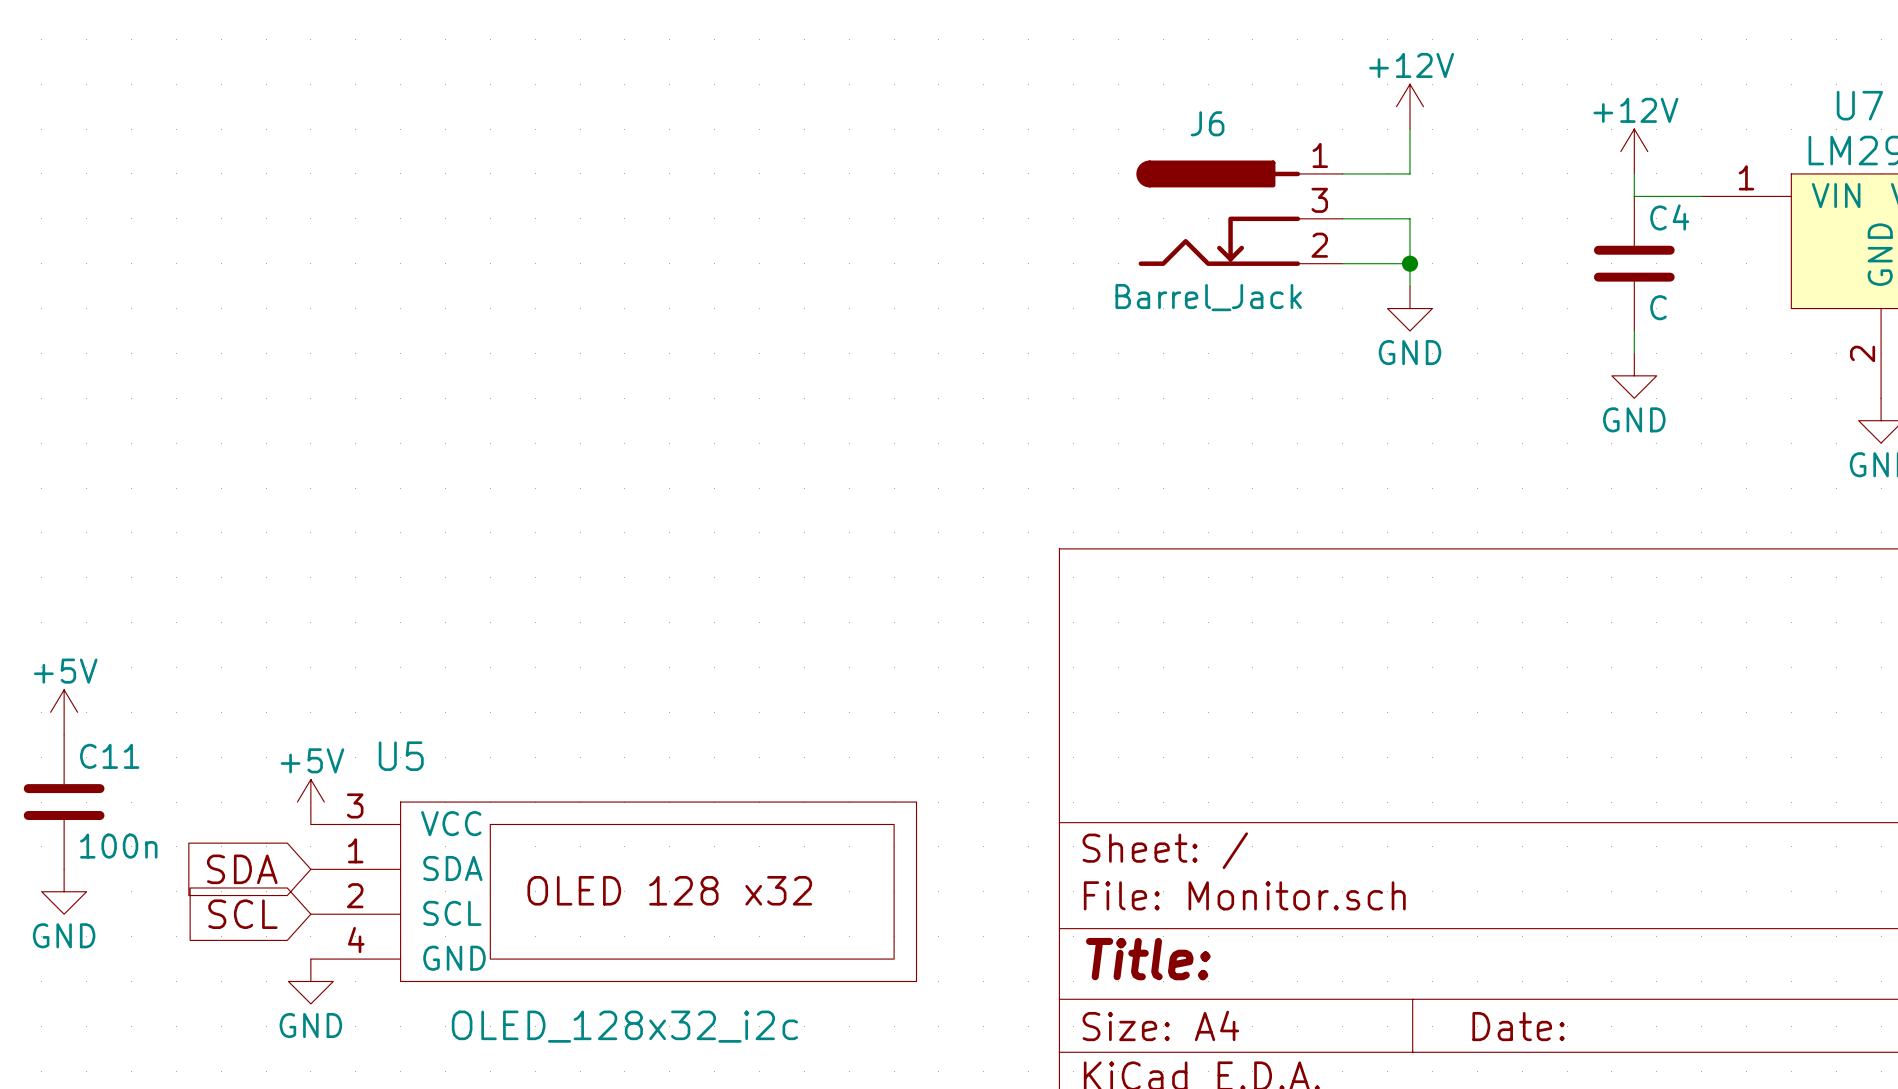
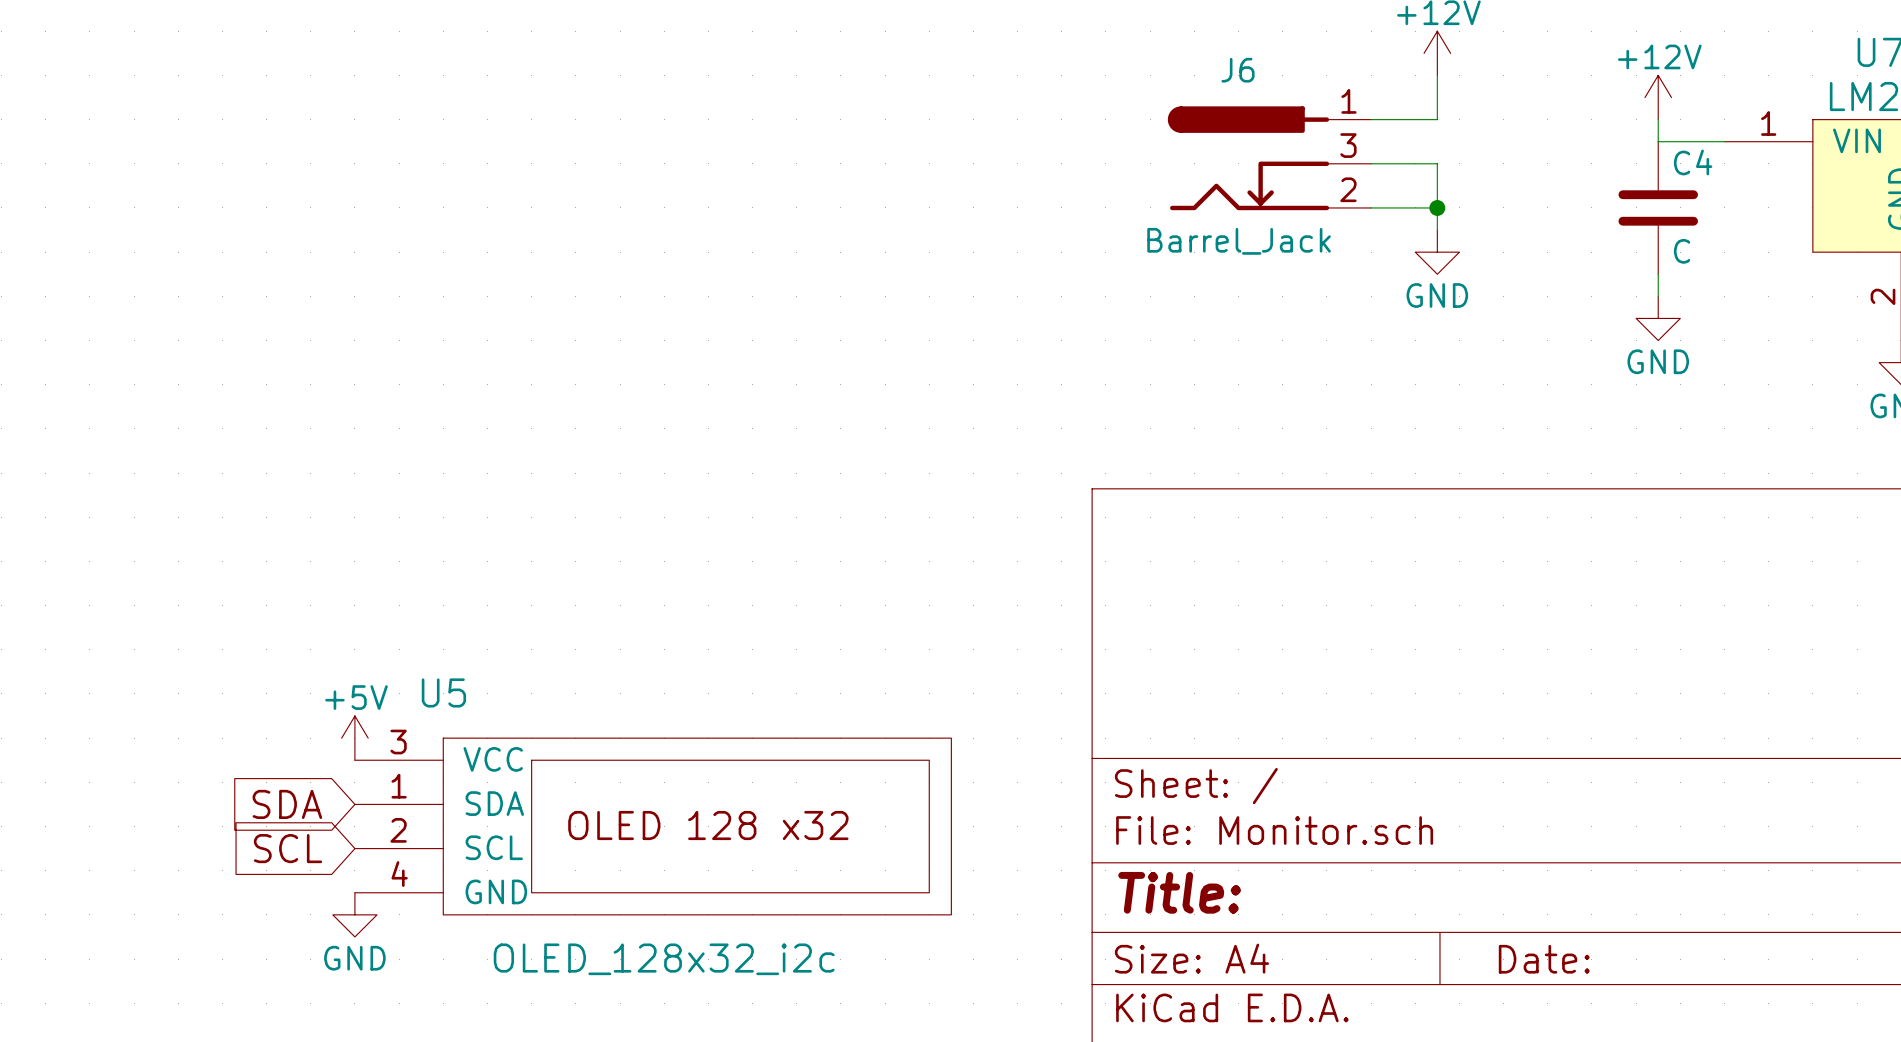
power symbol: +5V (64, 712) -> none
C11: 100n (64, 802) -> none
power symbol: GND (64, 891) -> none

